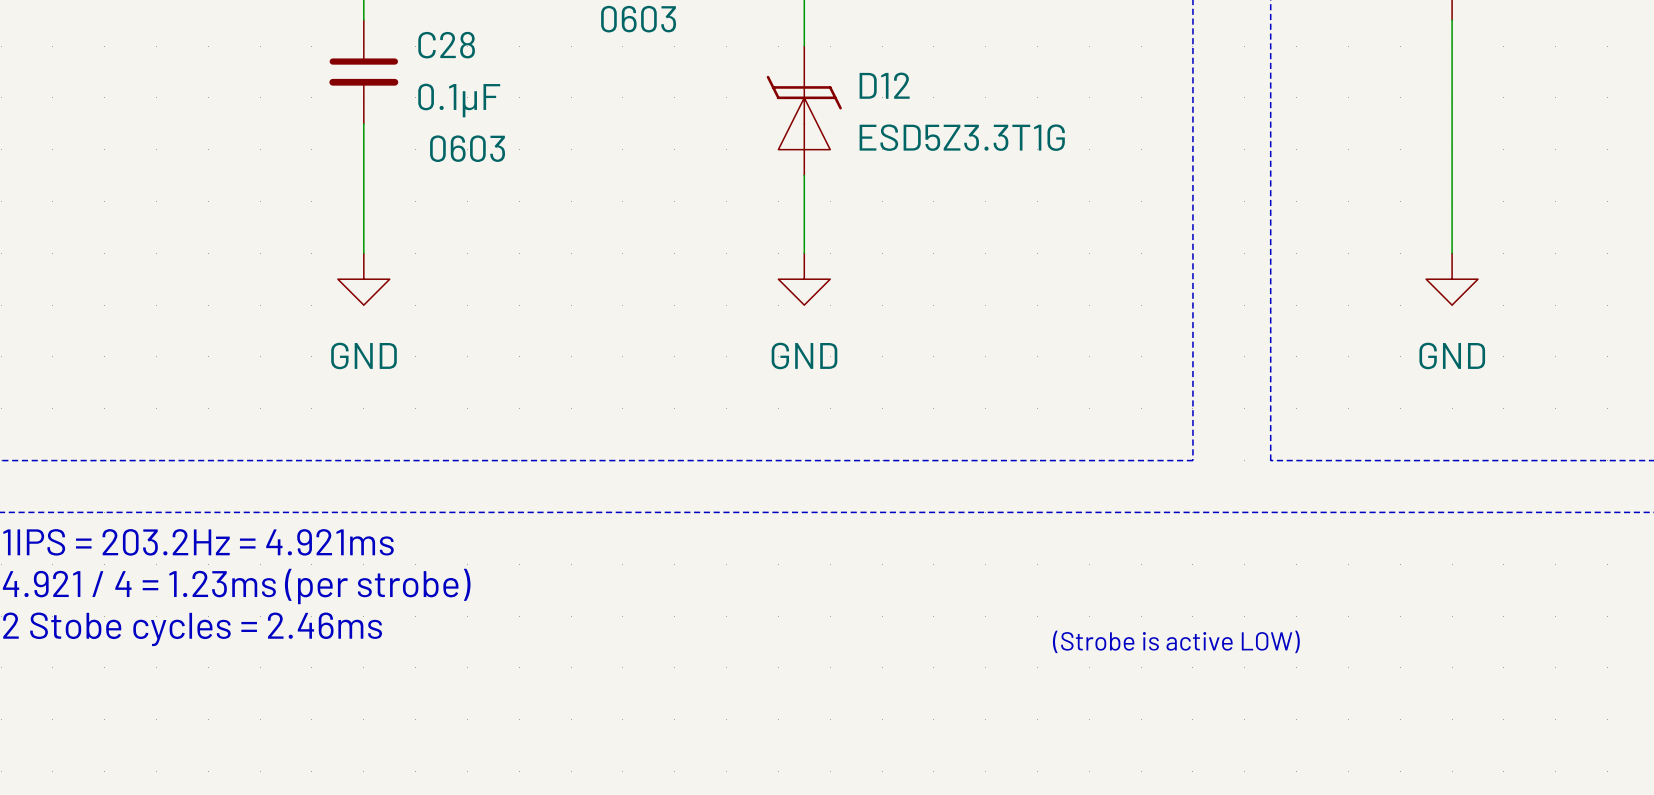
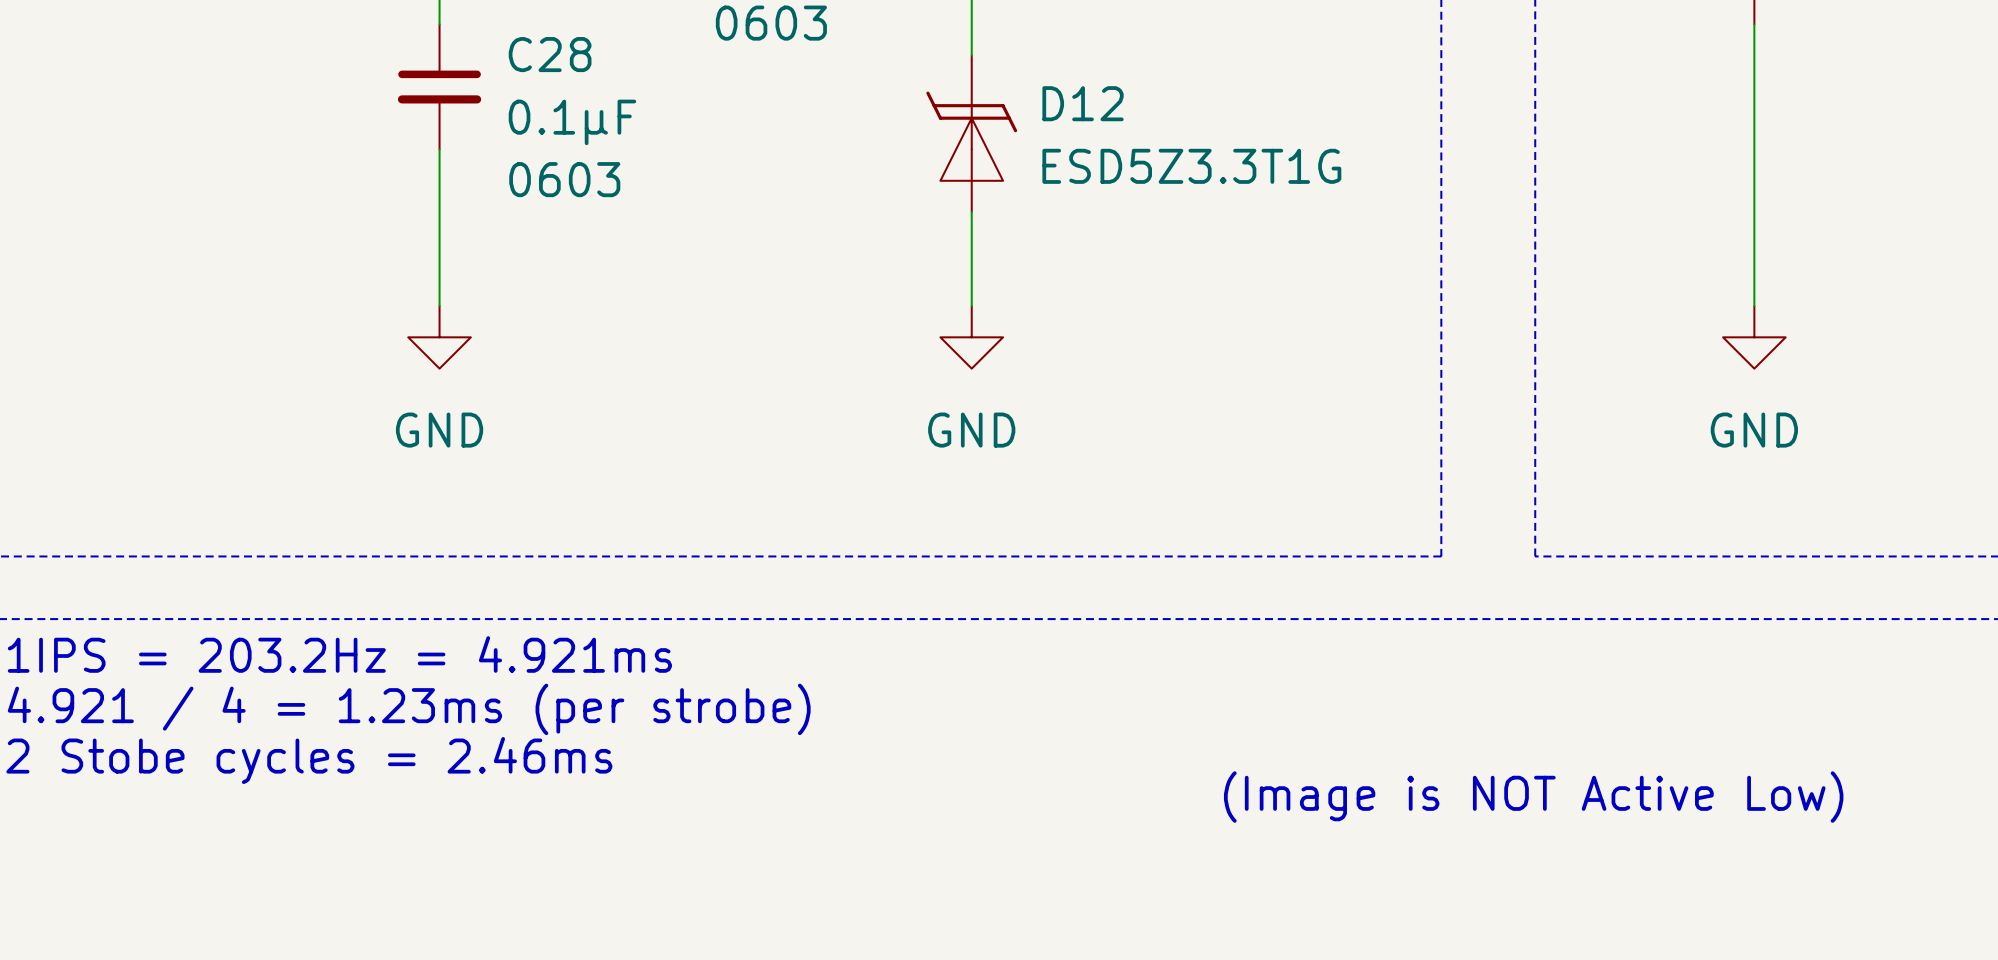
text: (Strobe is active LOW) (1176, 641) -> none
text: none -> (Image is NOT Active Low) (1533, 797)

